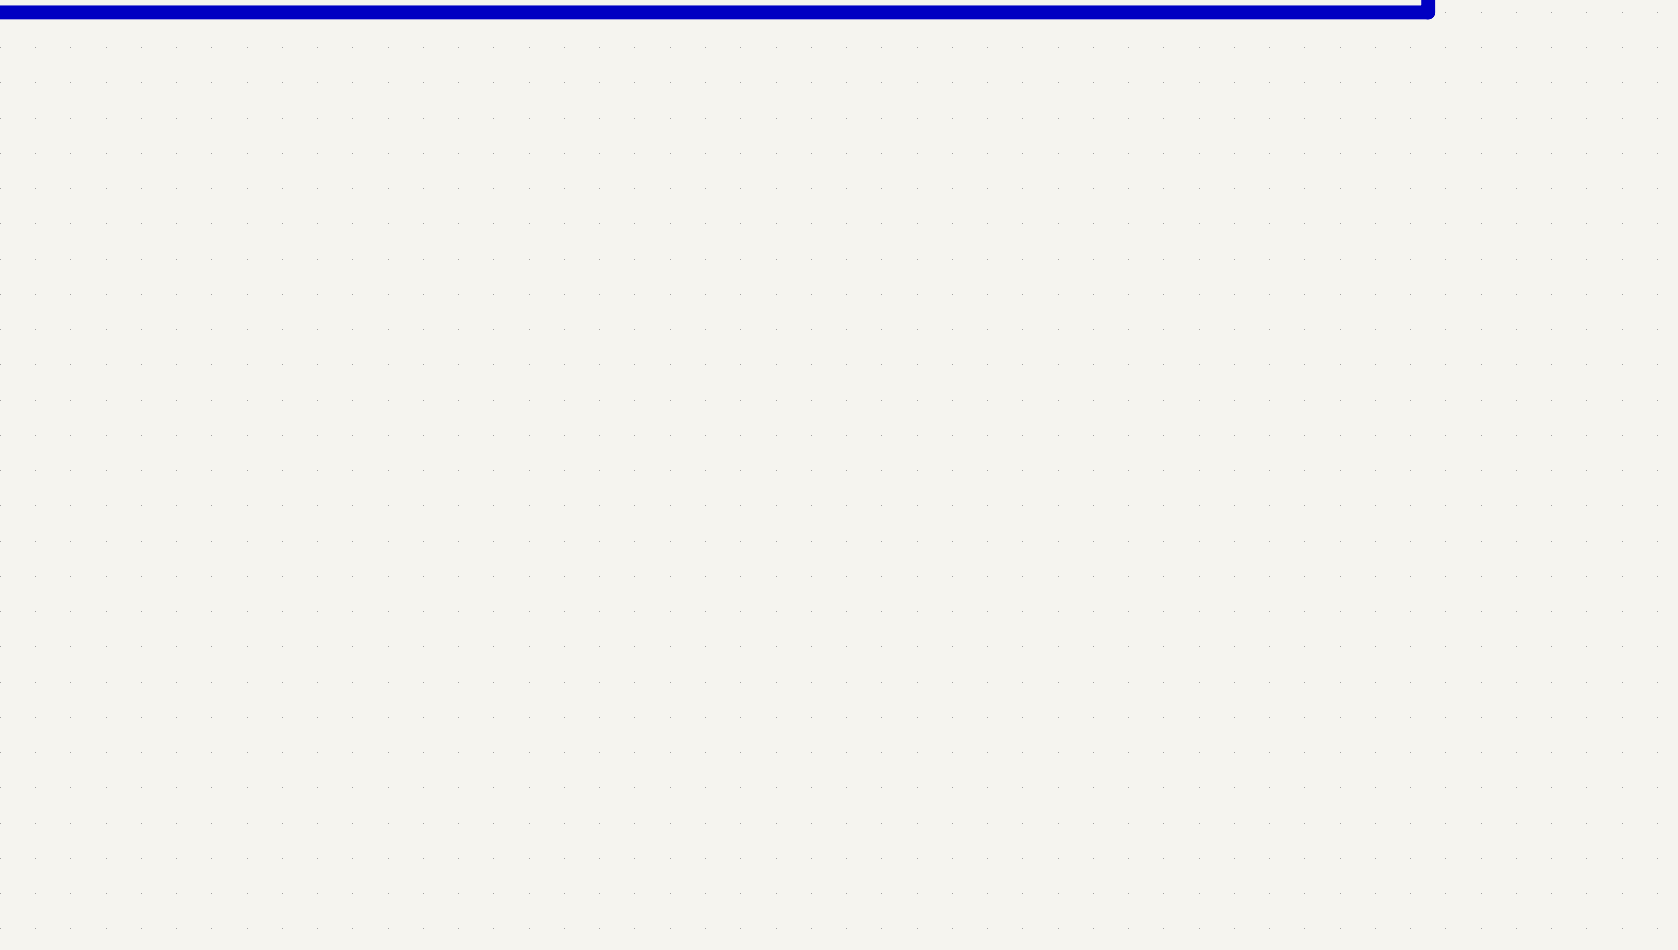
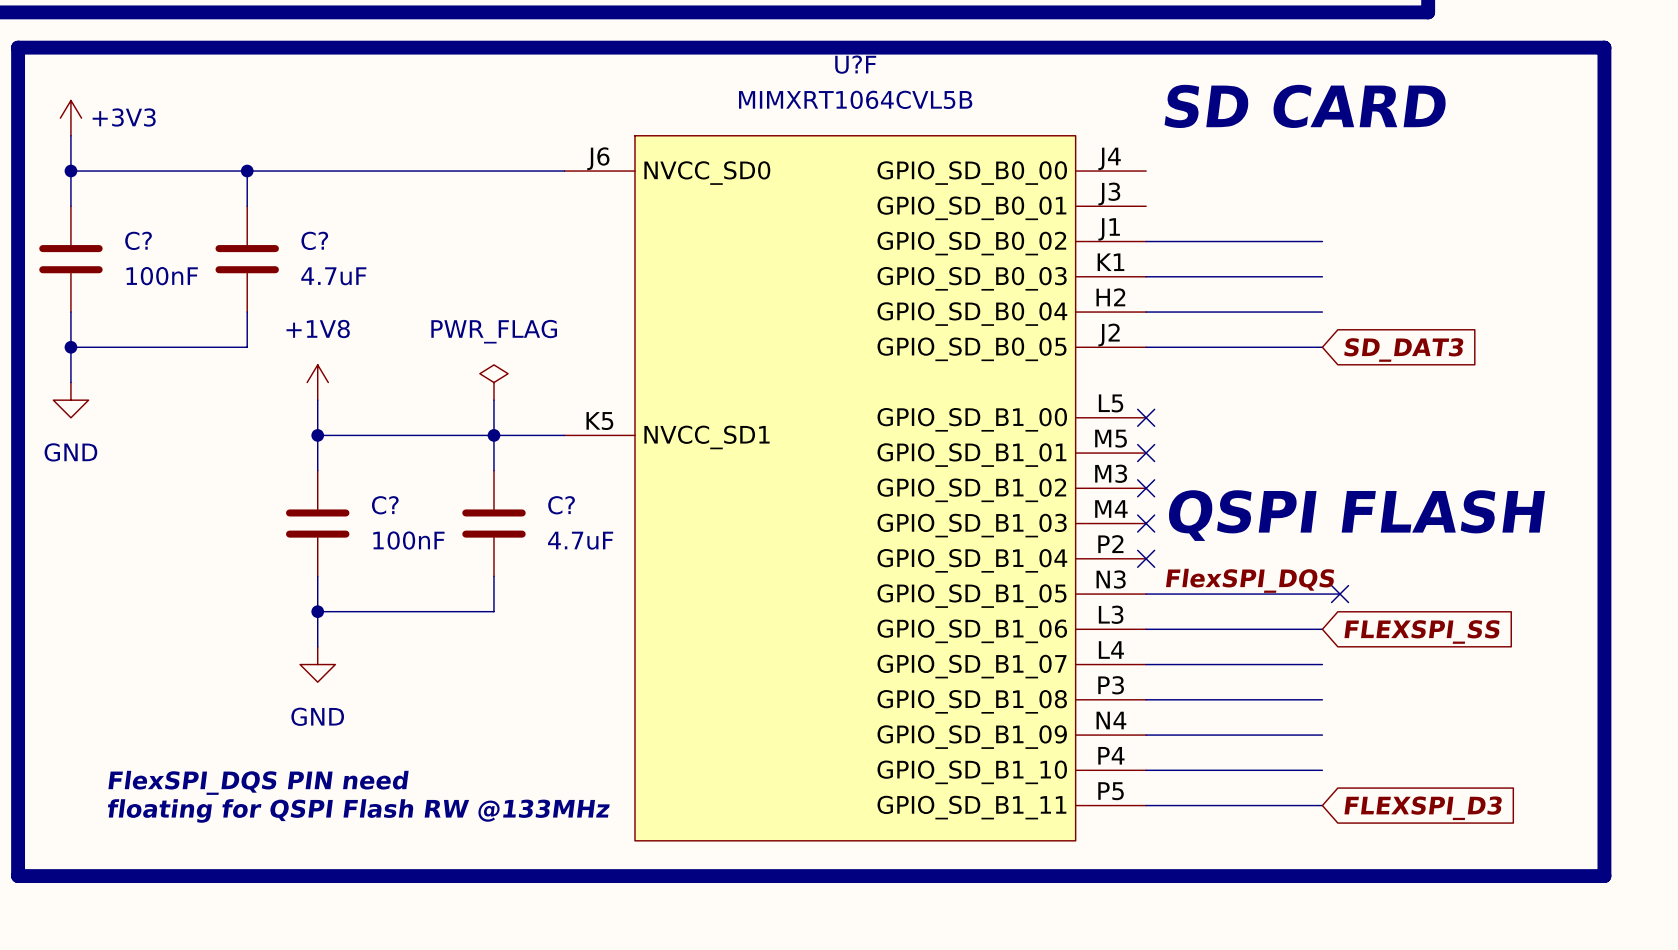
line: none -> (18, 47) (18, 876) (1604, 876) (1604, 47) (18, 47)
text: none -> SD CARD (1305, 106)
power symbol: none -> +3V3 (70, 118)
wire: none -> (70, 135) (70, 206)
wire: none -> (70, 171) (564, 171)
junction: none -> (70, 171)
wire: none -> (247, 171) (247, 206)
junction: none -> (247, 171)
wire: none -> (1146, 241) (1322, 241)
C?: none -> 100nF (70, 259)
C?: none -> 4.7uF (247, 259)
wire: none -> (1146, 276) (1322, 276)
wire: none -> (70, 312) (70, 382)
wire: none -> (247, 312) (247, 347) (70, 347)
wire: none -> (1146, 312) (1322, 312)
junction: none -> (70, 347)
wire: none -> (1146, 347) (1322, 347)
global label: none -> SD_DAT3 (1403, 349)
power symbol: none -> +1V8 (317, 382)
power symbol: none -> PWR_FLAG (493, 382)
power symbol: none -> GND (70, 400)
wire: none -> (317, 400) (317, 470)
wire: none -> (493, 400) (493, 470)
no-connect mark: none -> (1146, 417)
wire: none -> (317, 435) (564, 435)
junction: none -> (317, 435)
junction: none -> (493, 435)
no-connect mark: none -> (1146, 453)
U?F: none -> MIMXRT1064CVL5B (855, 488)
no-connect mark: none -> (1146, 488)
text: none -> QSPI FLASH (1356, 515)
C?: none -> 100nF (317, 523)
C?: none -> 4.7uF (493, 523)
no-connect mark: none -> (1146, 523)
no-connect mark: none -> (1146, 558)
wire: none -> (317, 576) (317, 646)
wire: none -> (493, 576) (493, 611) (317, 611)
label: none -> FlexSPI_DQS (1250, 580)
wire: none -> (1146, 594) (1340, 594)
no-connect mark: none -> (1340, 594)
junction: none -> (317, 611)
wire: none -> (1146, 629) (1322, 629)
global label: none -> FLEXSPI_SS (1422, 631)
power symbol: none -> GND (317, 664)
wire: none -> (1146, 664) (1322, 664)
wire: none -> (1146, 699) (1322, 699)
wire: none -> (1146, 735) (1322, 735)
wire: none -> (1146, 770) (1322, 770)
text: none -> FlexSPI_DQS PIN need (258, 782)
wire: none -> (1146, 805) (1322, 805)
global label: none -> FLEXSPI_D3 (1423, 808)
text: none -> floating for QSPI Flash RW @133MHz (358, 810)

